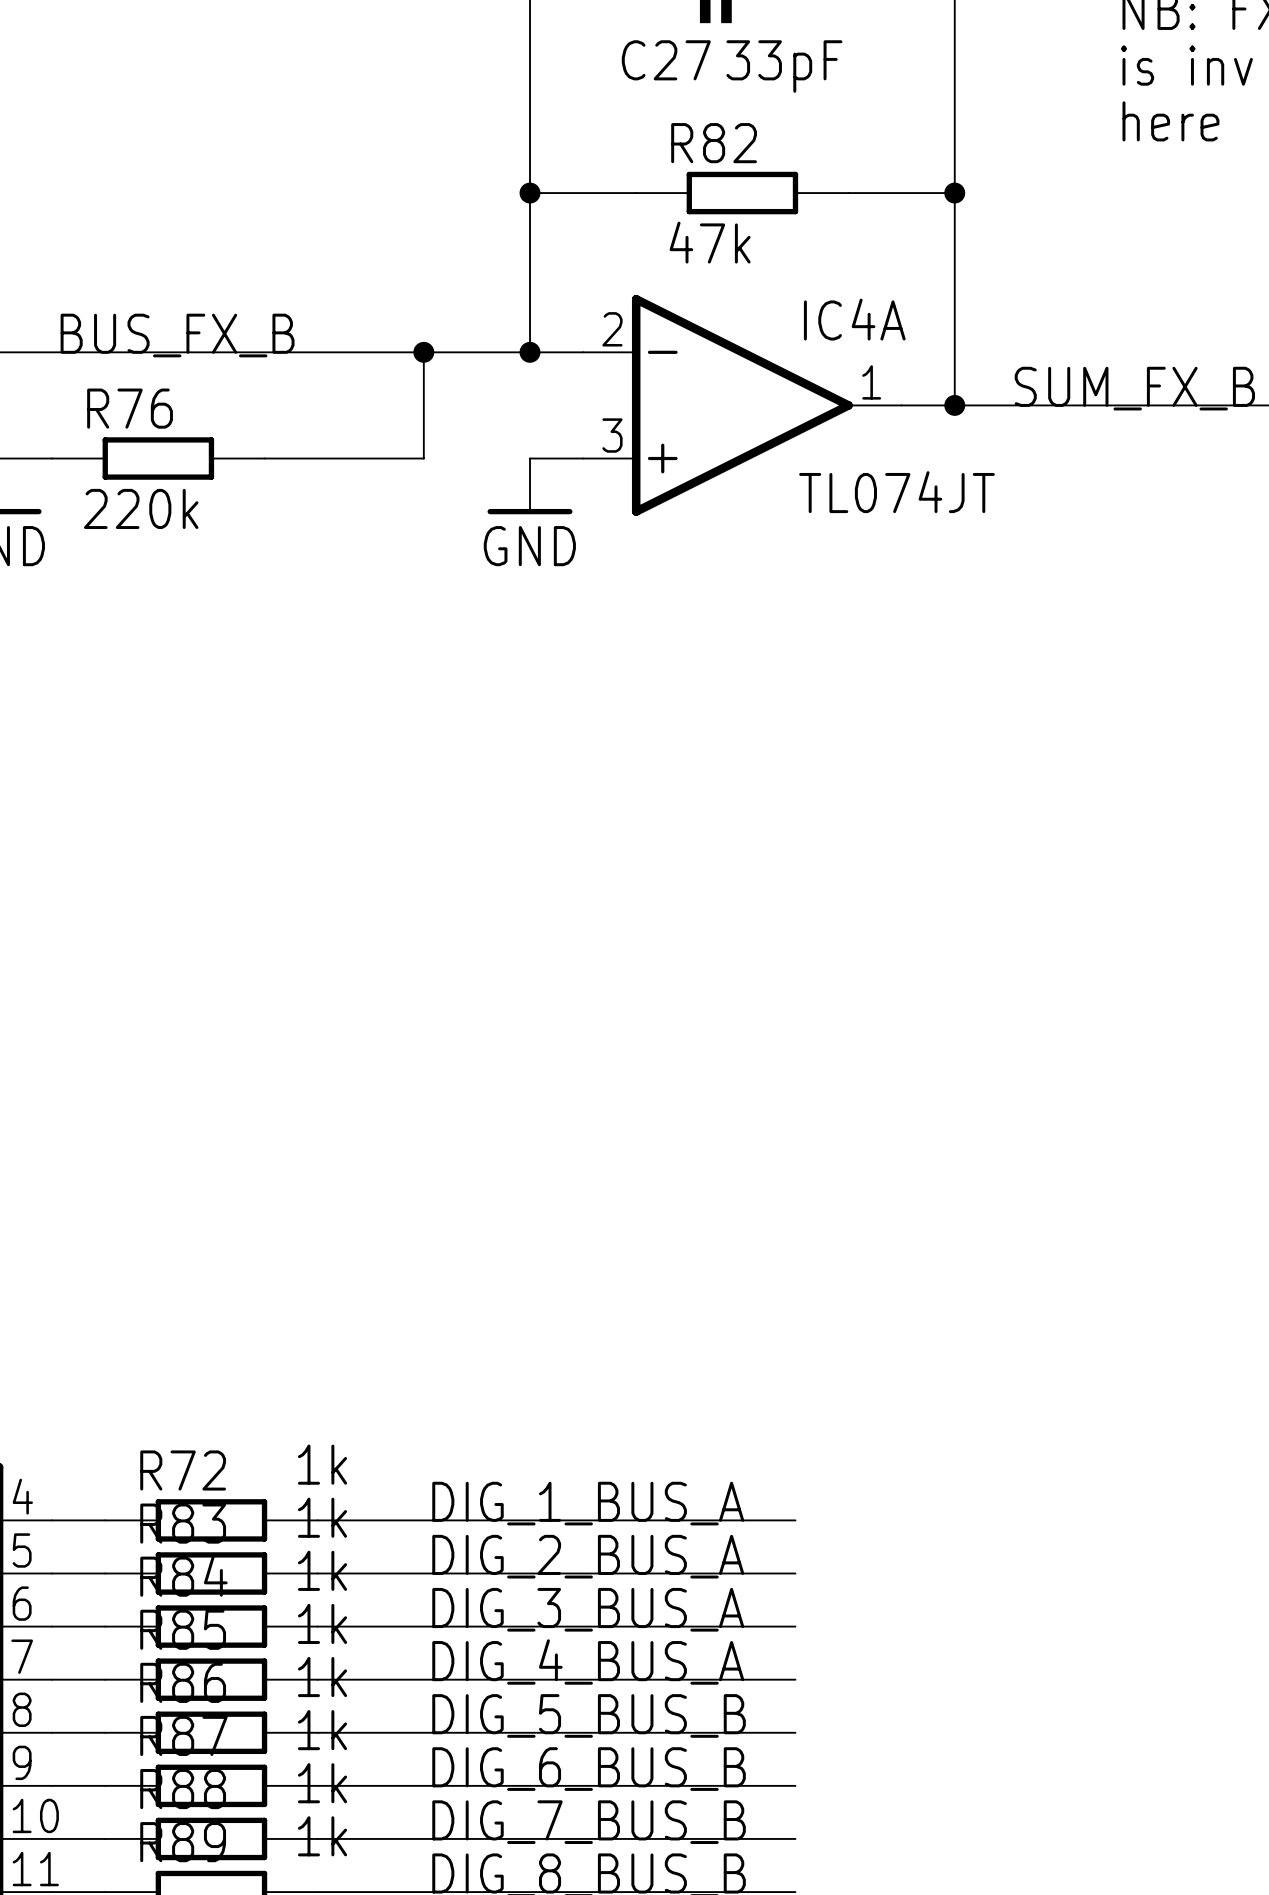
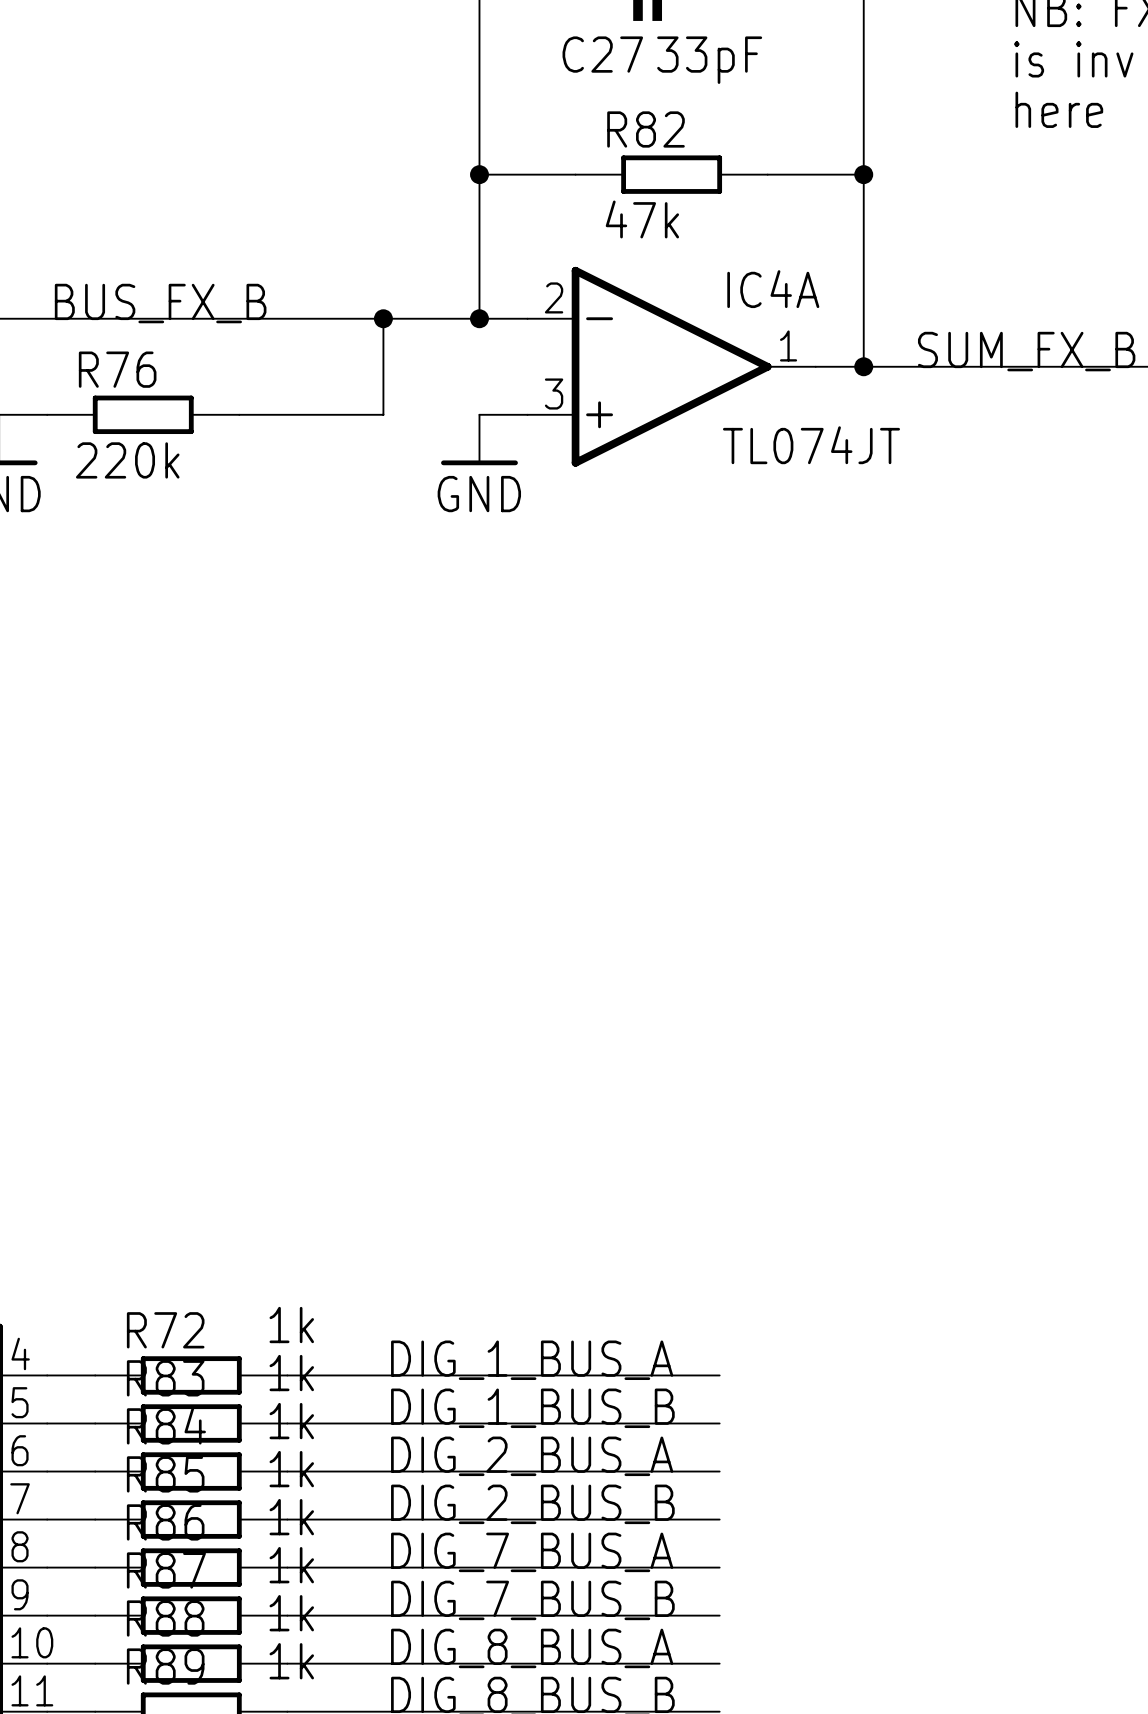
label: DIG_2_BUS_A (588, 1556) -> DIG_1_BUS_B (532, 1408)
label: DIG_3_BUS_A (588, 1609) -> DIG_2_BUS_A (532, 1456)
label: DIG_4_BUS_A (588, 1661) -> DIG_2_BUS_B (532, 1504)
label: DIG_5_BUS_B (589, 1715) -> DIG_7_BUS_A (532, 1552)
label: DIG_6_BUS_B (589, 1769) -> DIG_7_BUS_B (532, 1600)
label: DIG_7_BUS_B (589, 1822) -> DIG_8_BUS_A (532, 1648)

